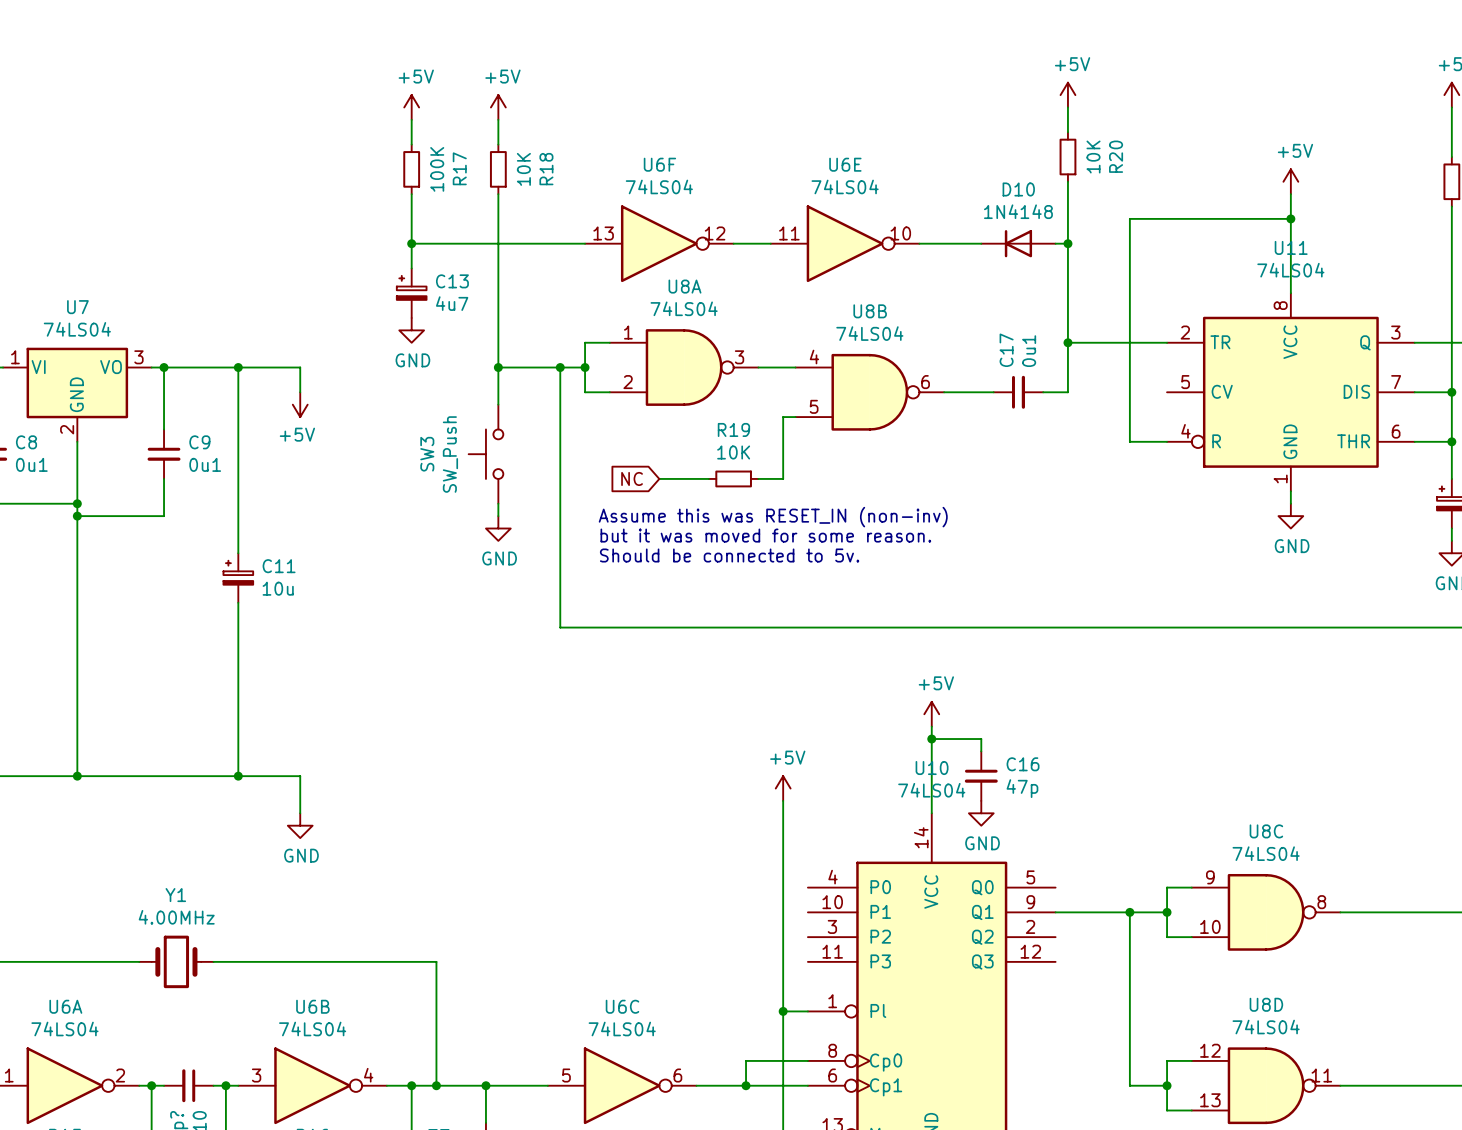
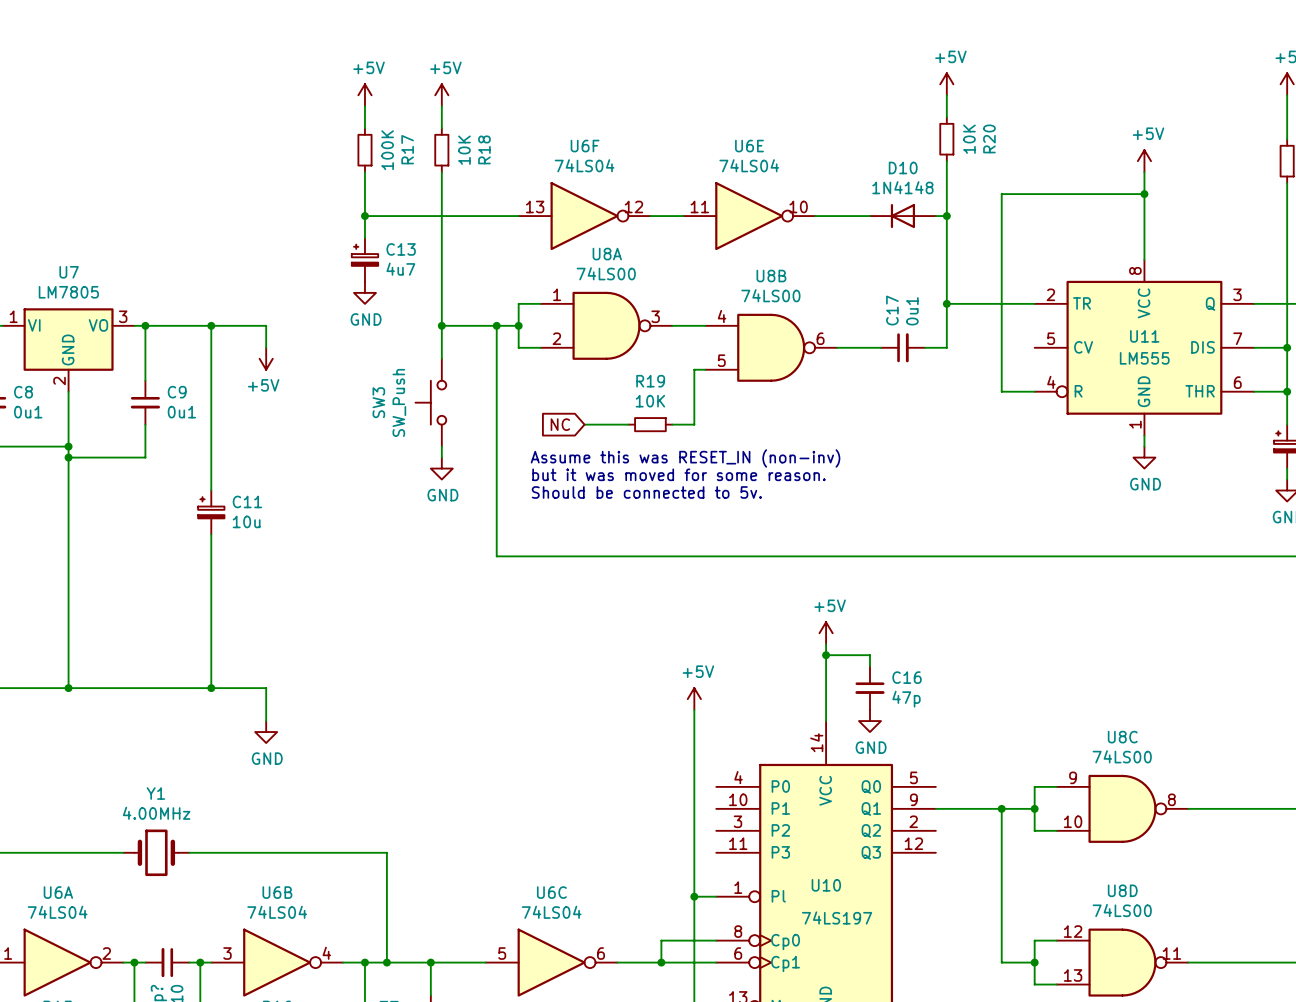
U11 name position: U11 (1291, 247) -> U11 (1144, 336)
U11 value: 74LS04 (1290, 270) -> LM555 (1144, 358)
U8A value: 74LS04 (684, 308) -> 74LS00 (606, 273)
U7 value: 74LS04 (77, 329) -> LM7805 (68, 292)
U8B value: 74LS04 (869, 333) -> 74LS00 (770, 295)
U10 name position: U10 (932, 768) -> U10 (826, 885)
U10 value: 74LS04 (931, 790) -> 74LS197 (837, 917)
U8C value: 74LS04 (1266, 853) -> 74LS00 (1122, 756)
U8D value: 74LS04 (1266, 1027) -> 74LS00 (1122, 910)

